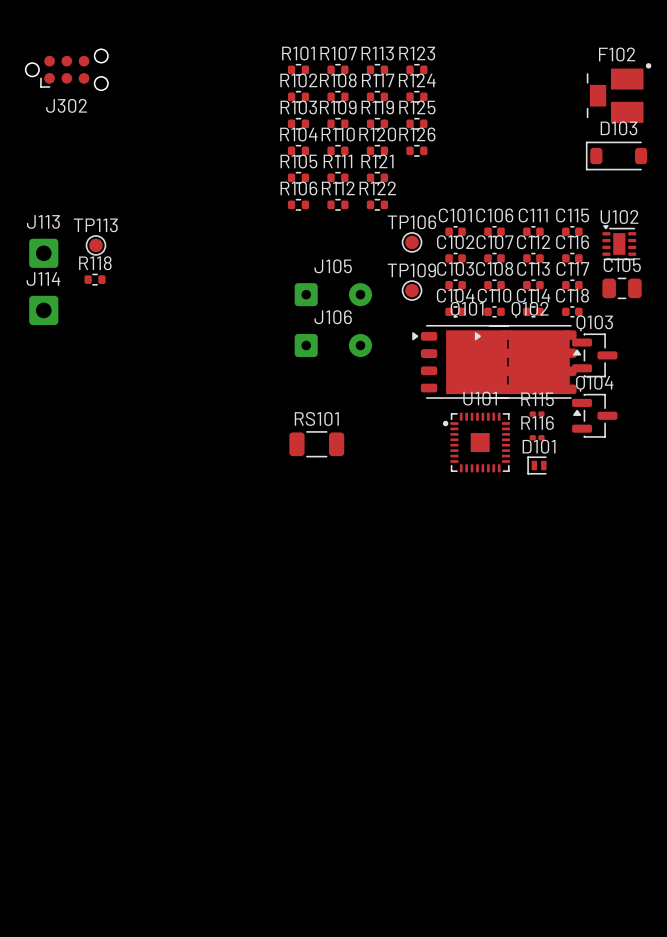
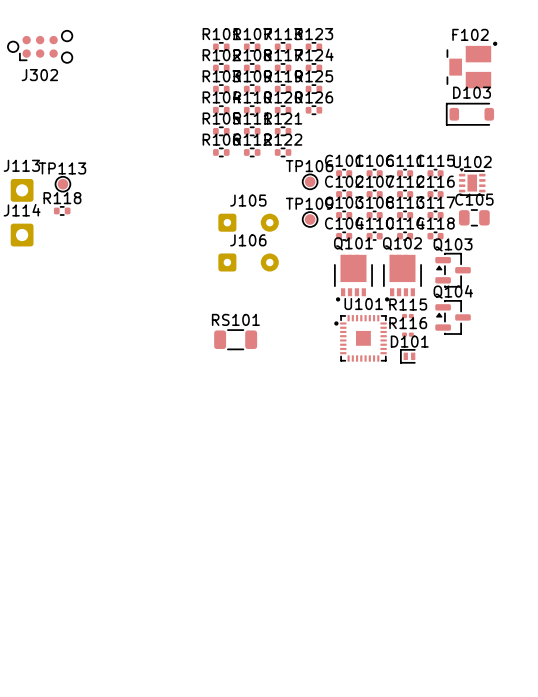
Q101 footprint: [412, 324, 514, 399] -> [334, 254, 373, 302]
Q102 footprint: [474, 324, 577, 399] -> [383, 254, 422, 302]

